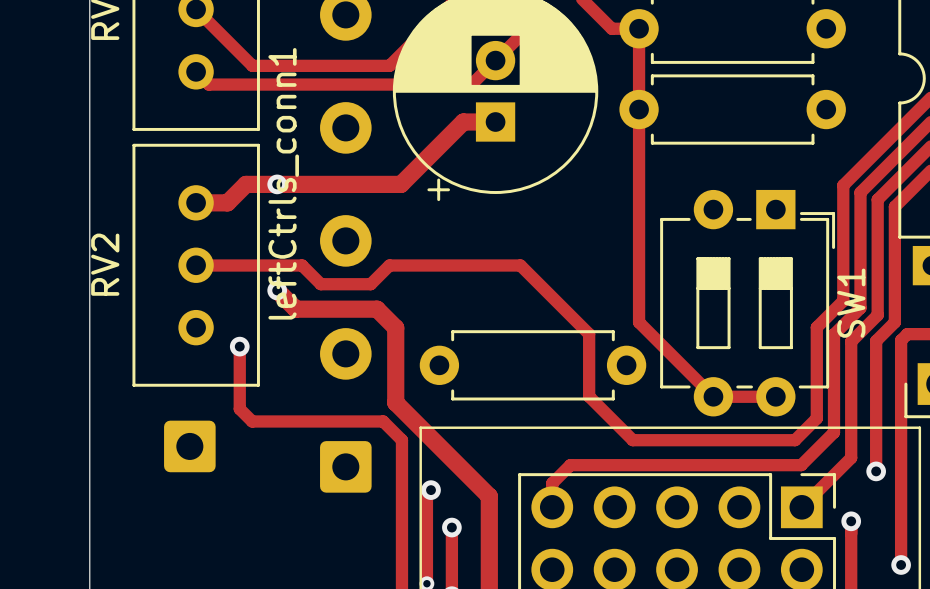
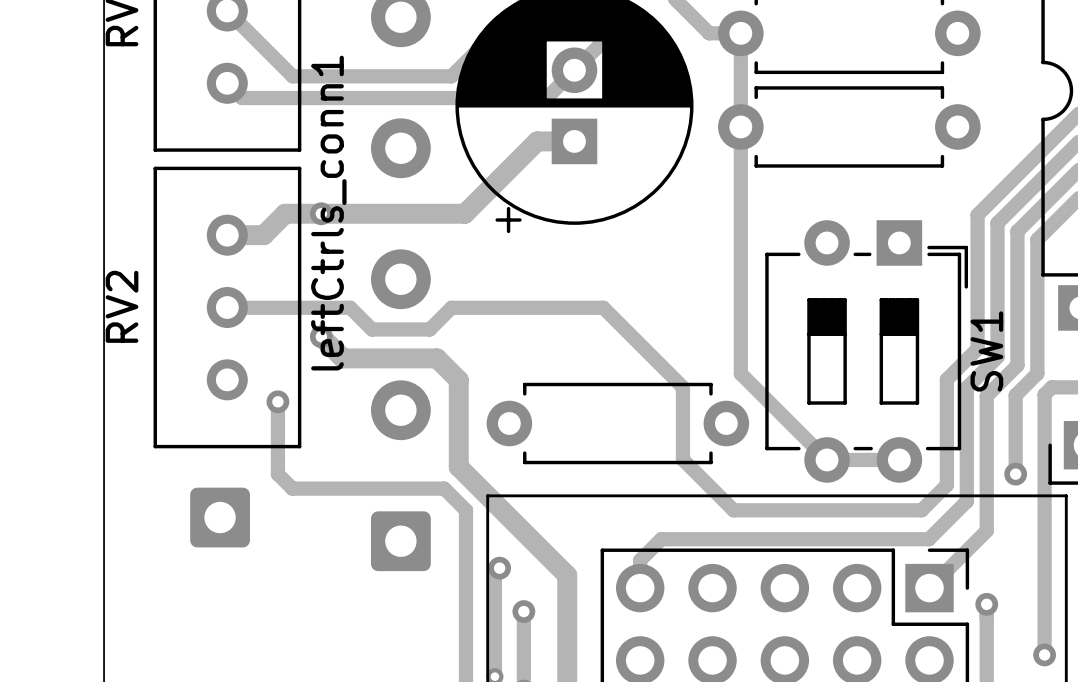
track: (876, 409) (876, 471) -> none
via position: (876, 471) -> (1015, 474)

